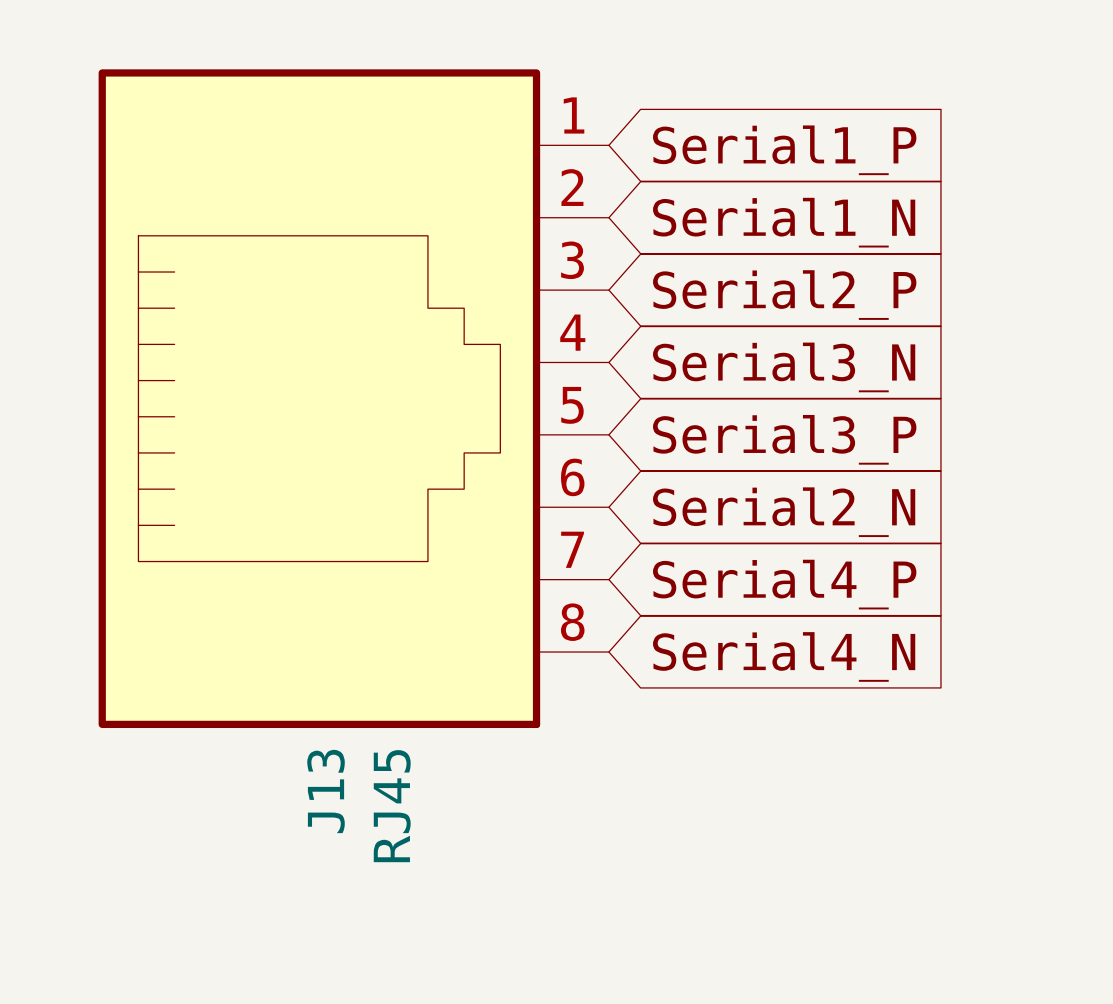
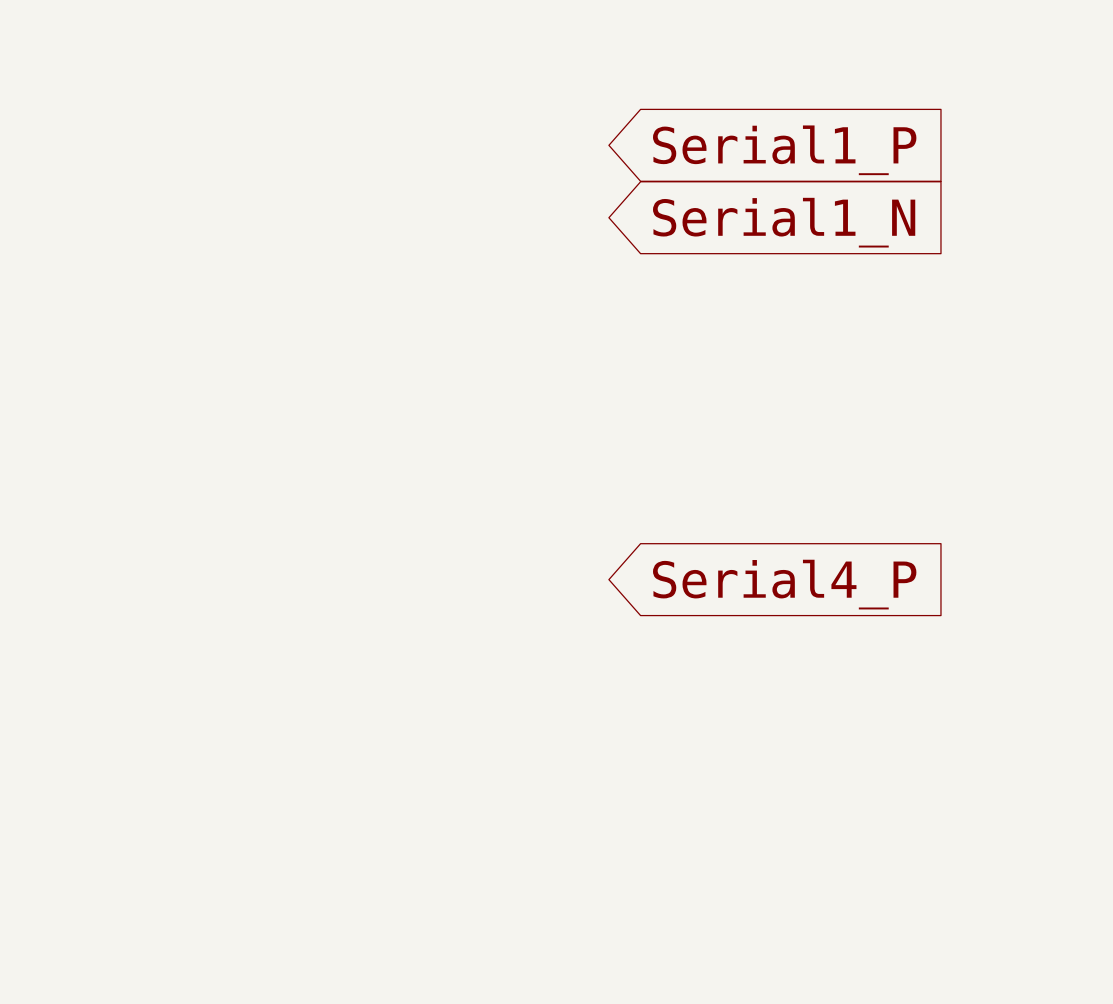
global label: Serial2_P (784, 295) -> none
global label: Serial3_N (784, 367) -> none
J13: RJ45 (353, 398) -> none
global label: Serial3_P (784, 439) -> none
global label: Serial2_N (784, 512) -> none
global label: Serial4_N (784, 656) -> none

